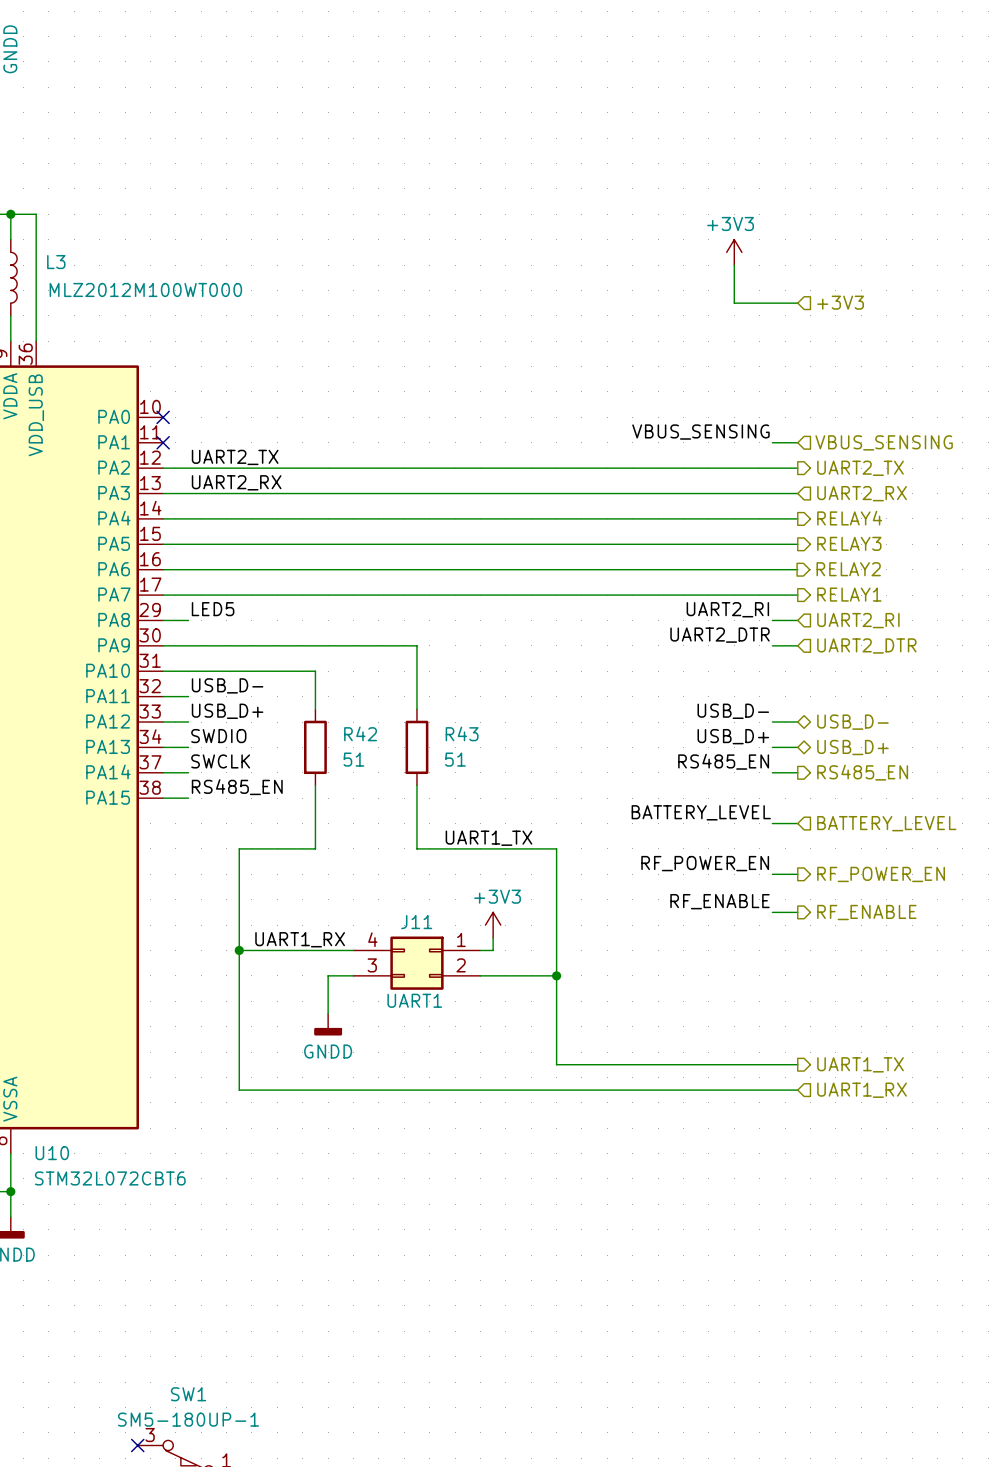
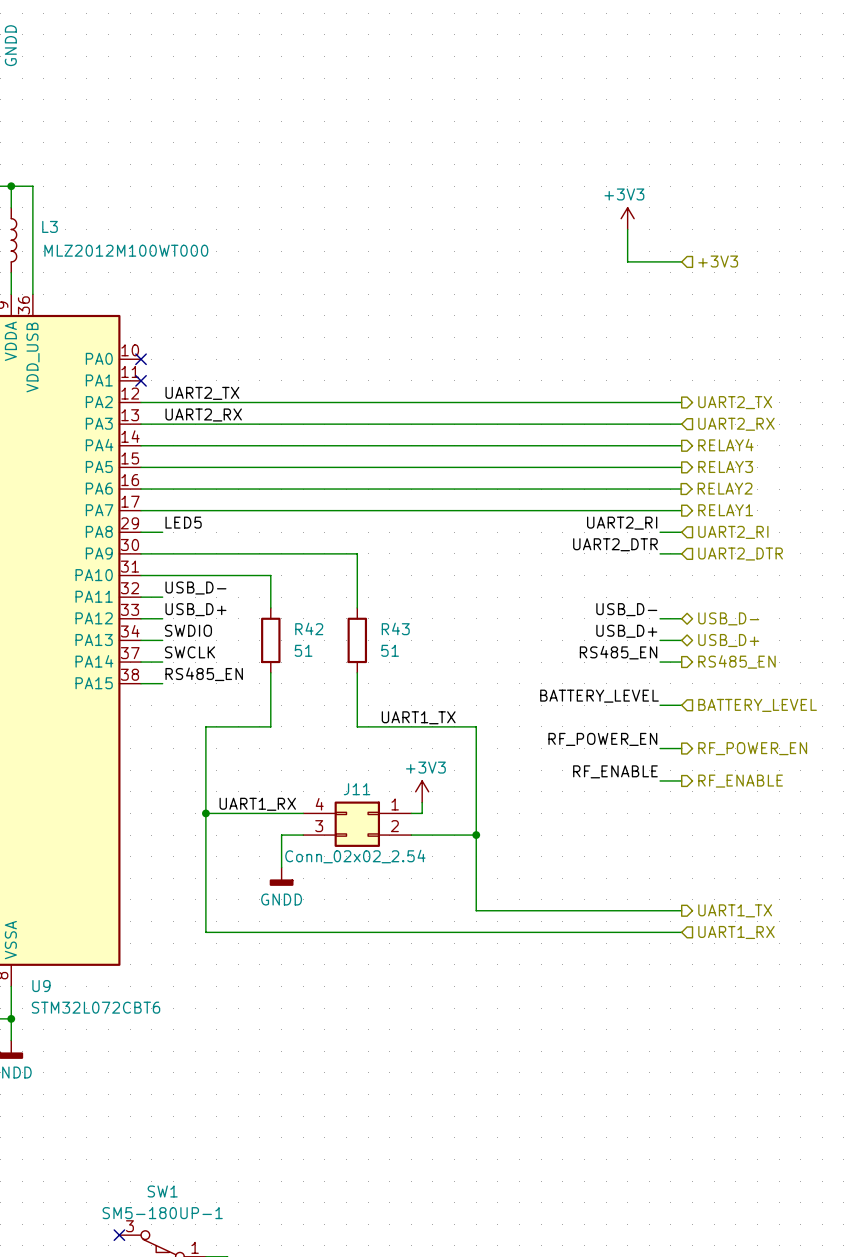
label: VBUS_SENSING (700, 432) -> none
wire: (772, 442) (797, 442) -> none
hierarchical label: VBUS_SENSING (884, 442) -> none
J11 value: UART1 (414, 1000) -> Conn_02x02_2.54 (355, 856)
U10 name: U10 (52, 1153) -> U9 (41, 986)

